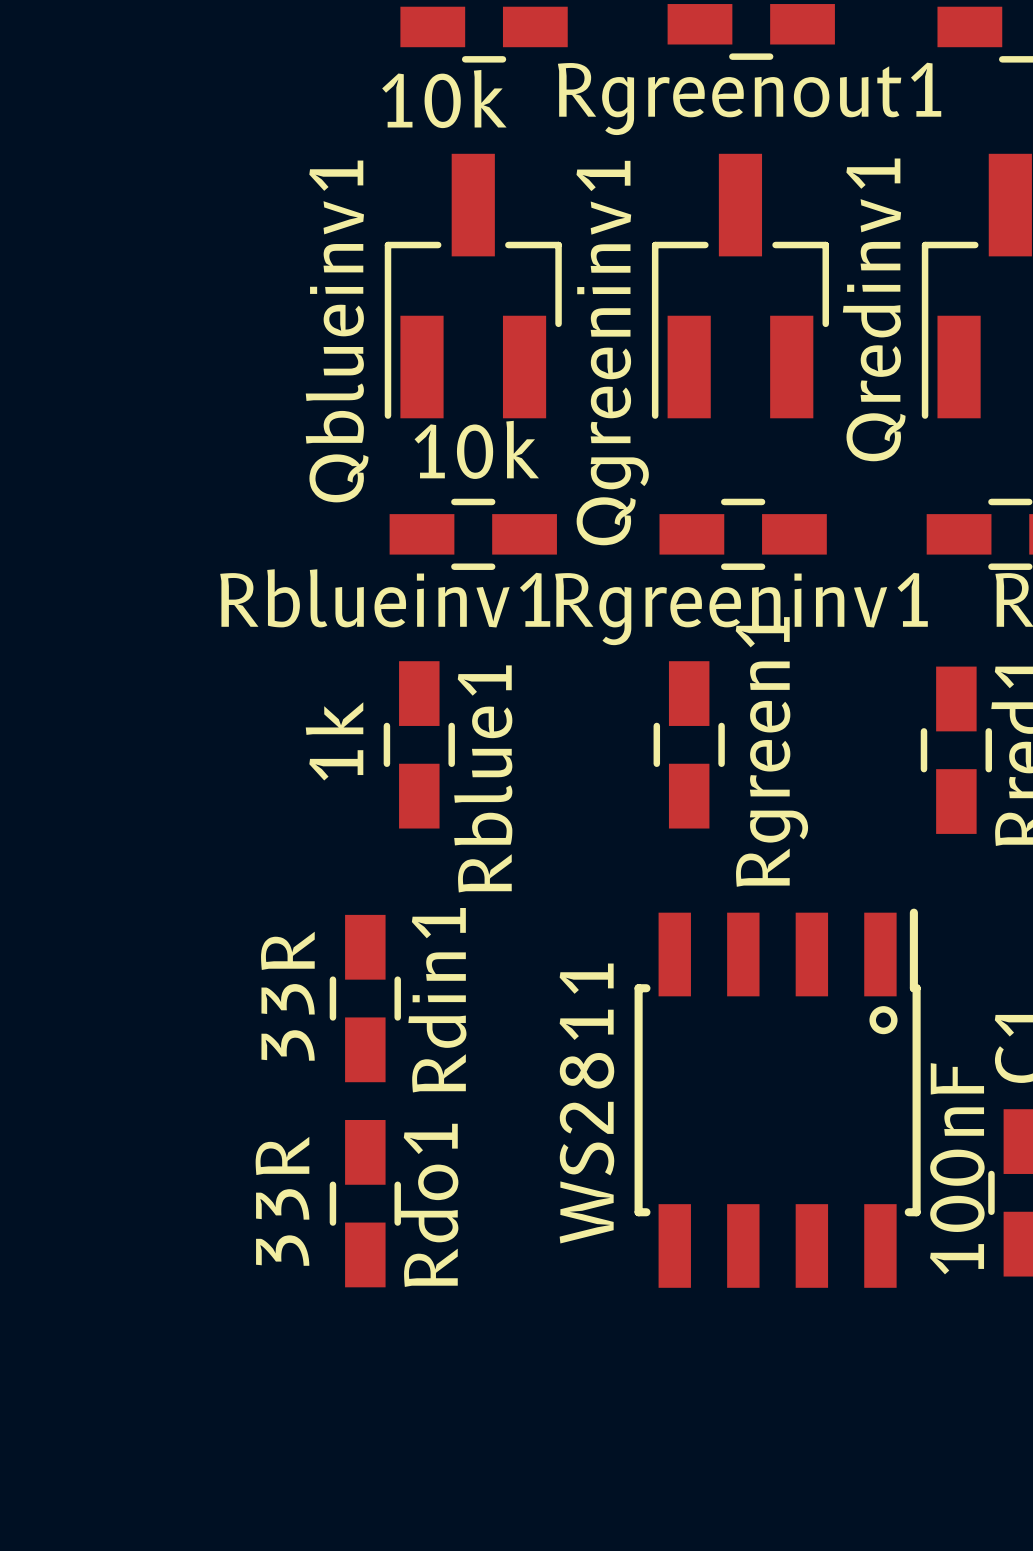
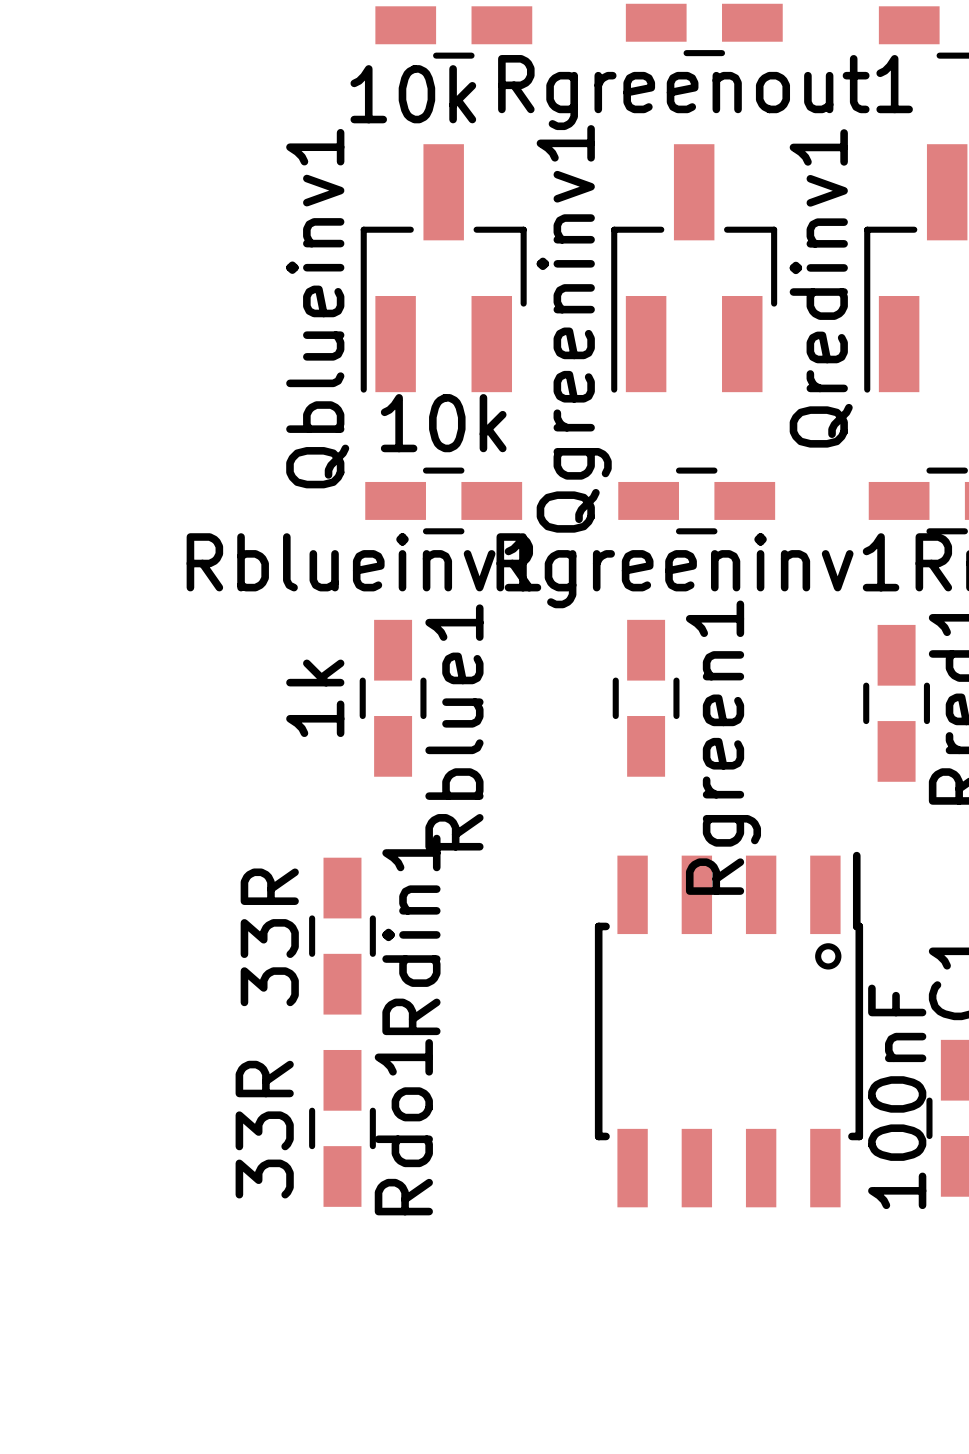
Rgreen1 name position: Rgreen1 (771, 751) -> Rgreen1 (723, 747)
part value: WS2811 (586, 1103) -> none

